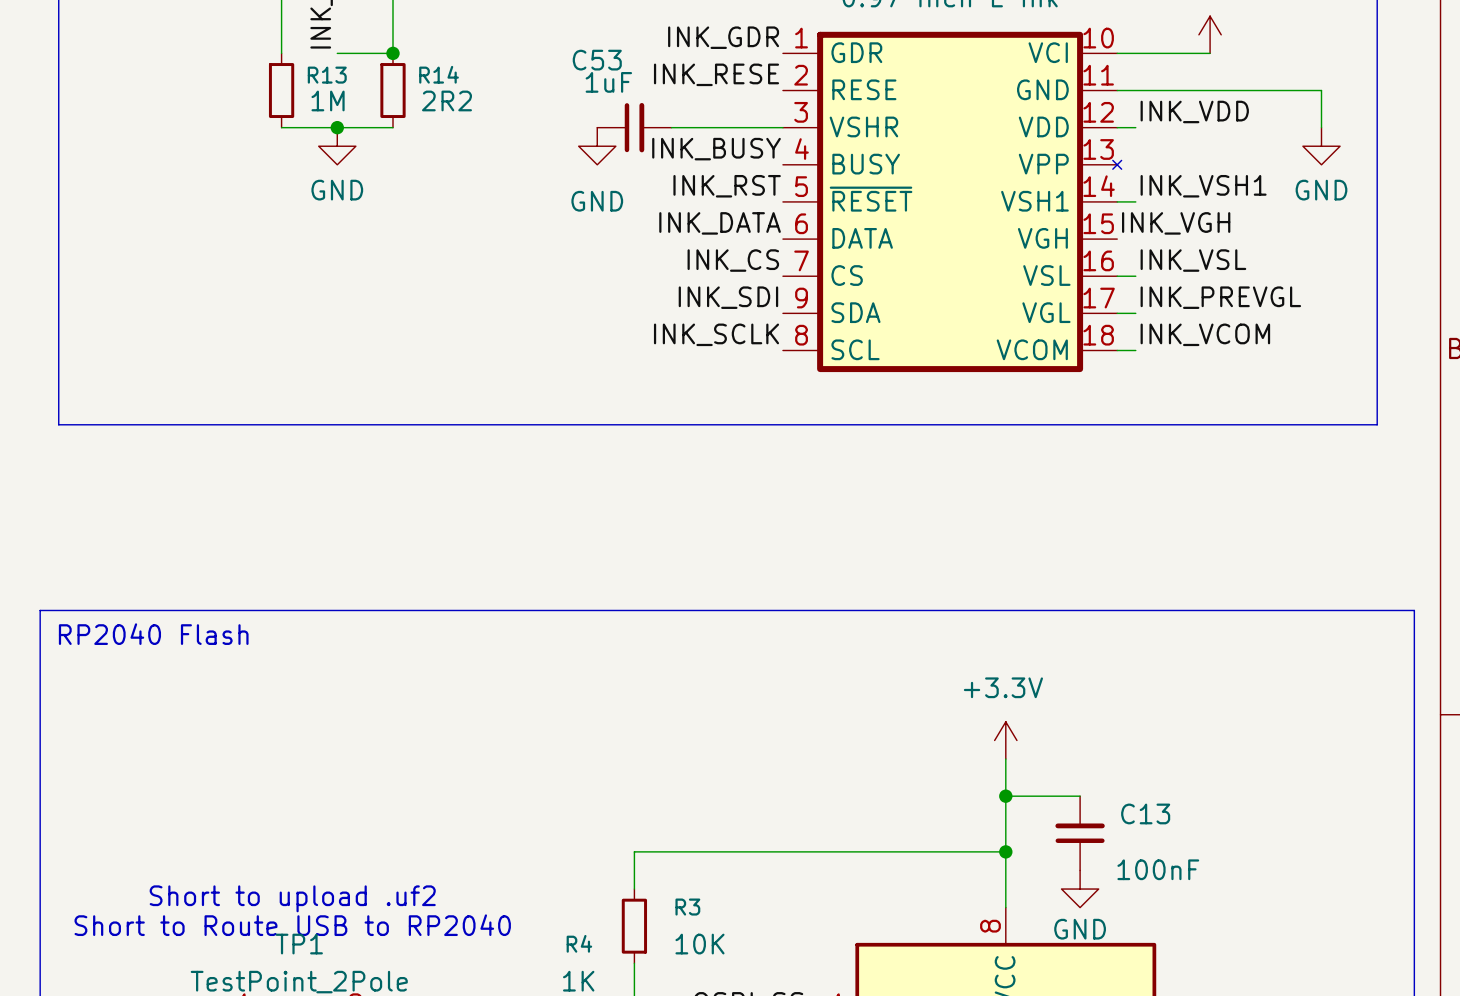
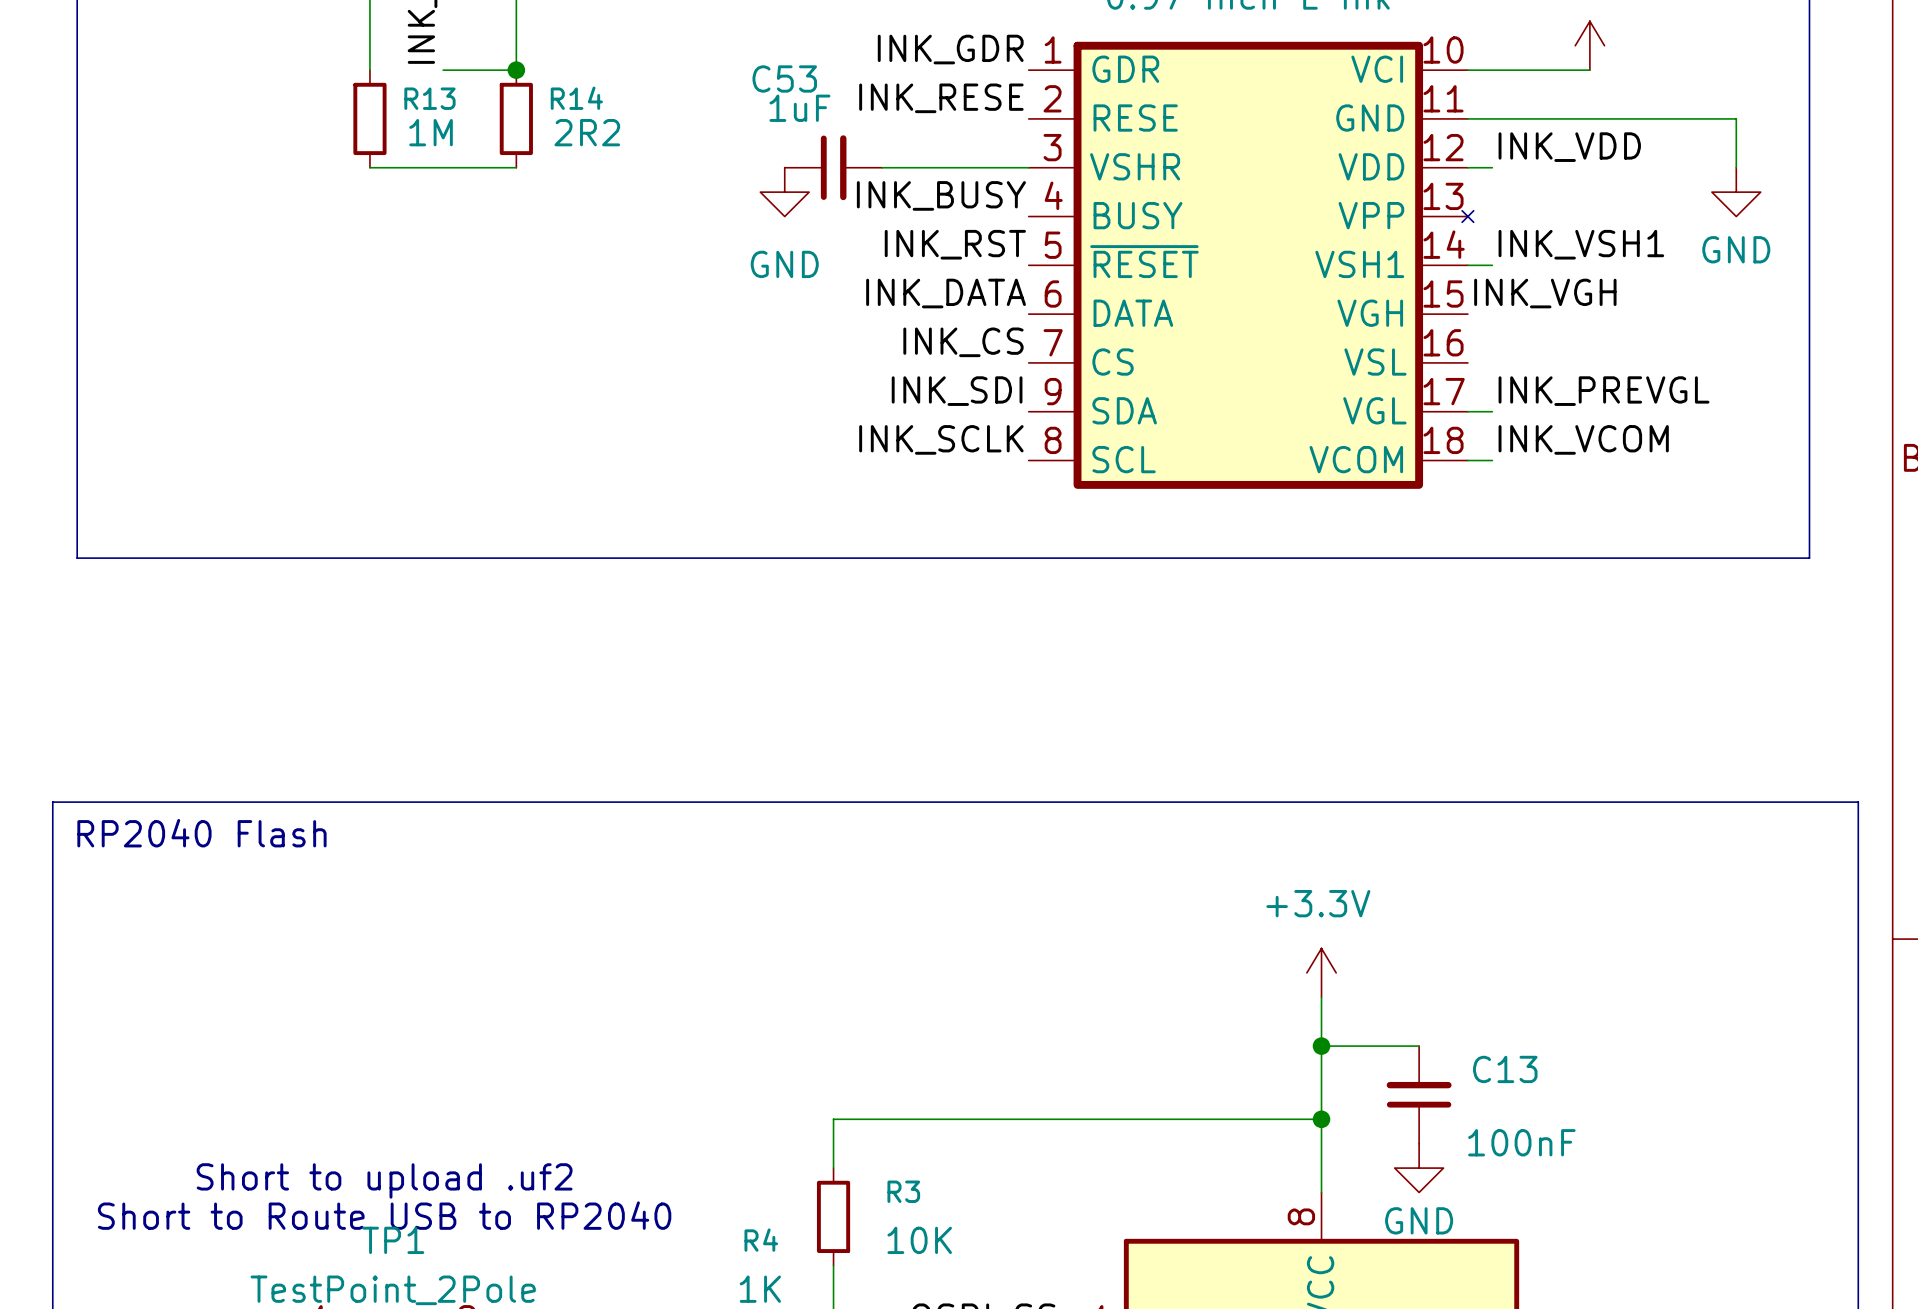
junction: (337, 127) -> none
power symbol: GND (337, 146) -> none
label: INK_VSL (1193, 260) -> none
wire: (1117, 276) (1135, 276) -> none

